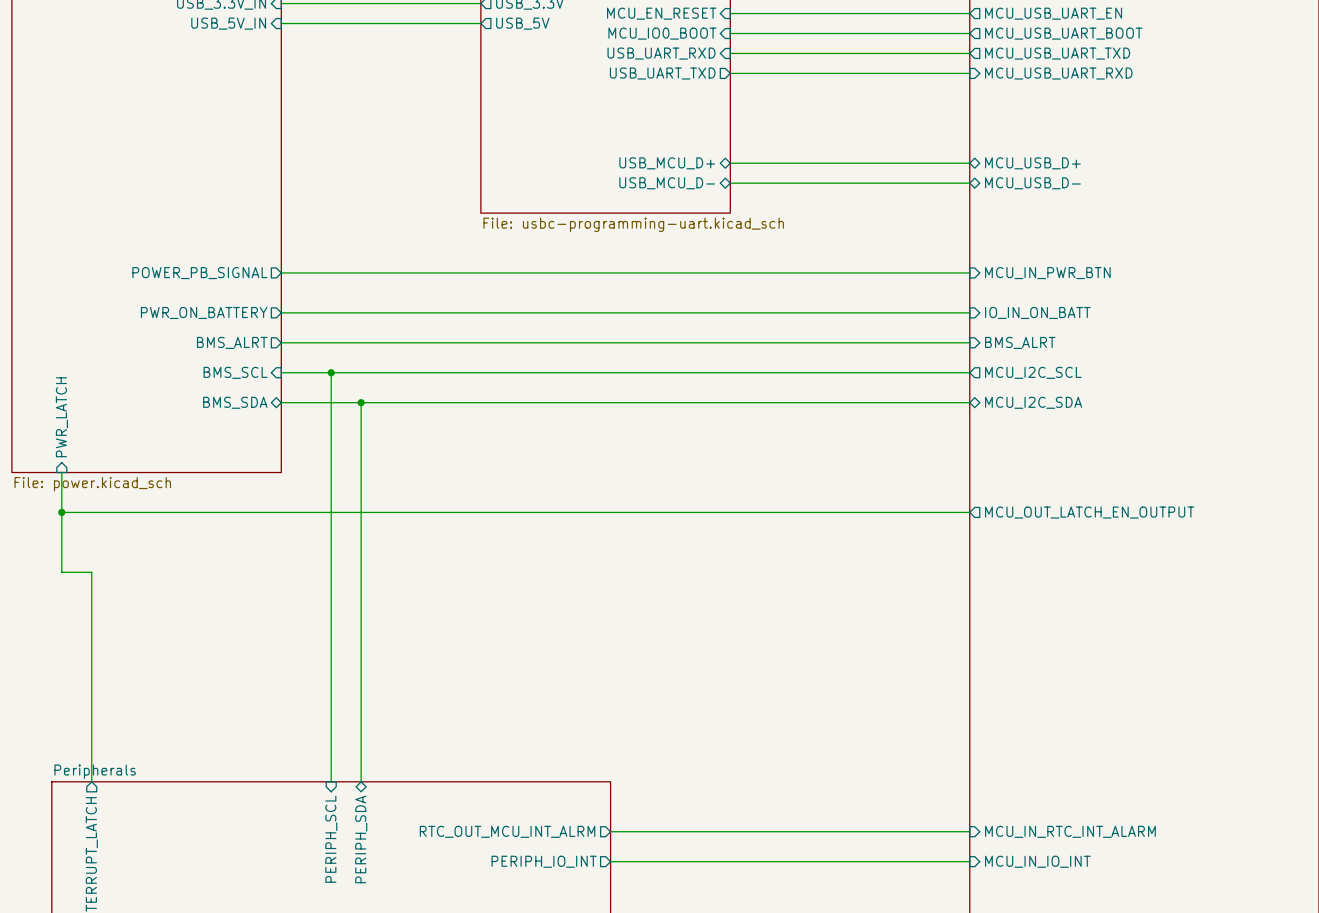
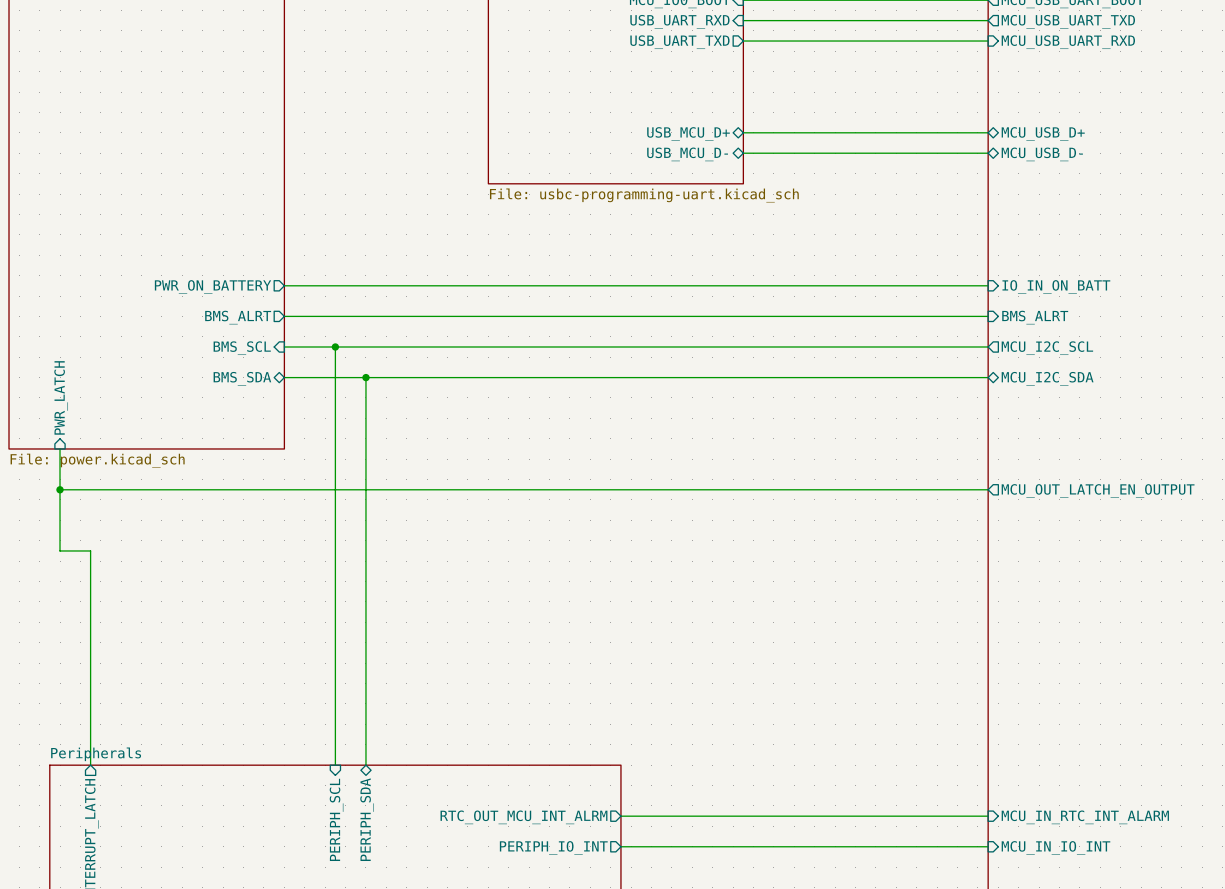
wire: (281, 272) (969, 272) -> none
sheet pin: POWER_PB_SIGNAL (199, 273) -> none
sheet pin: MCU_IN_PWR_BTN (1047, 273) -> none

